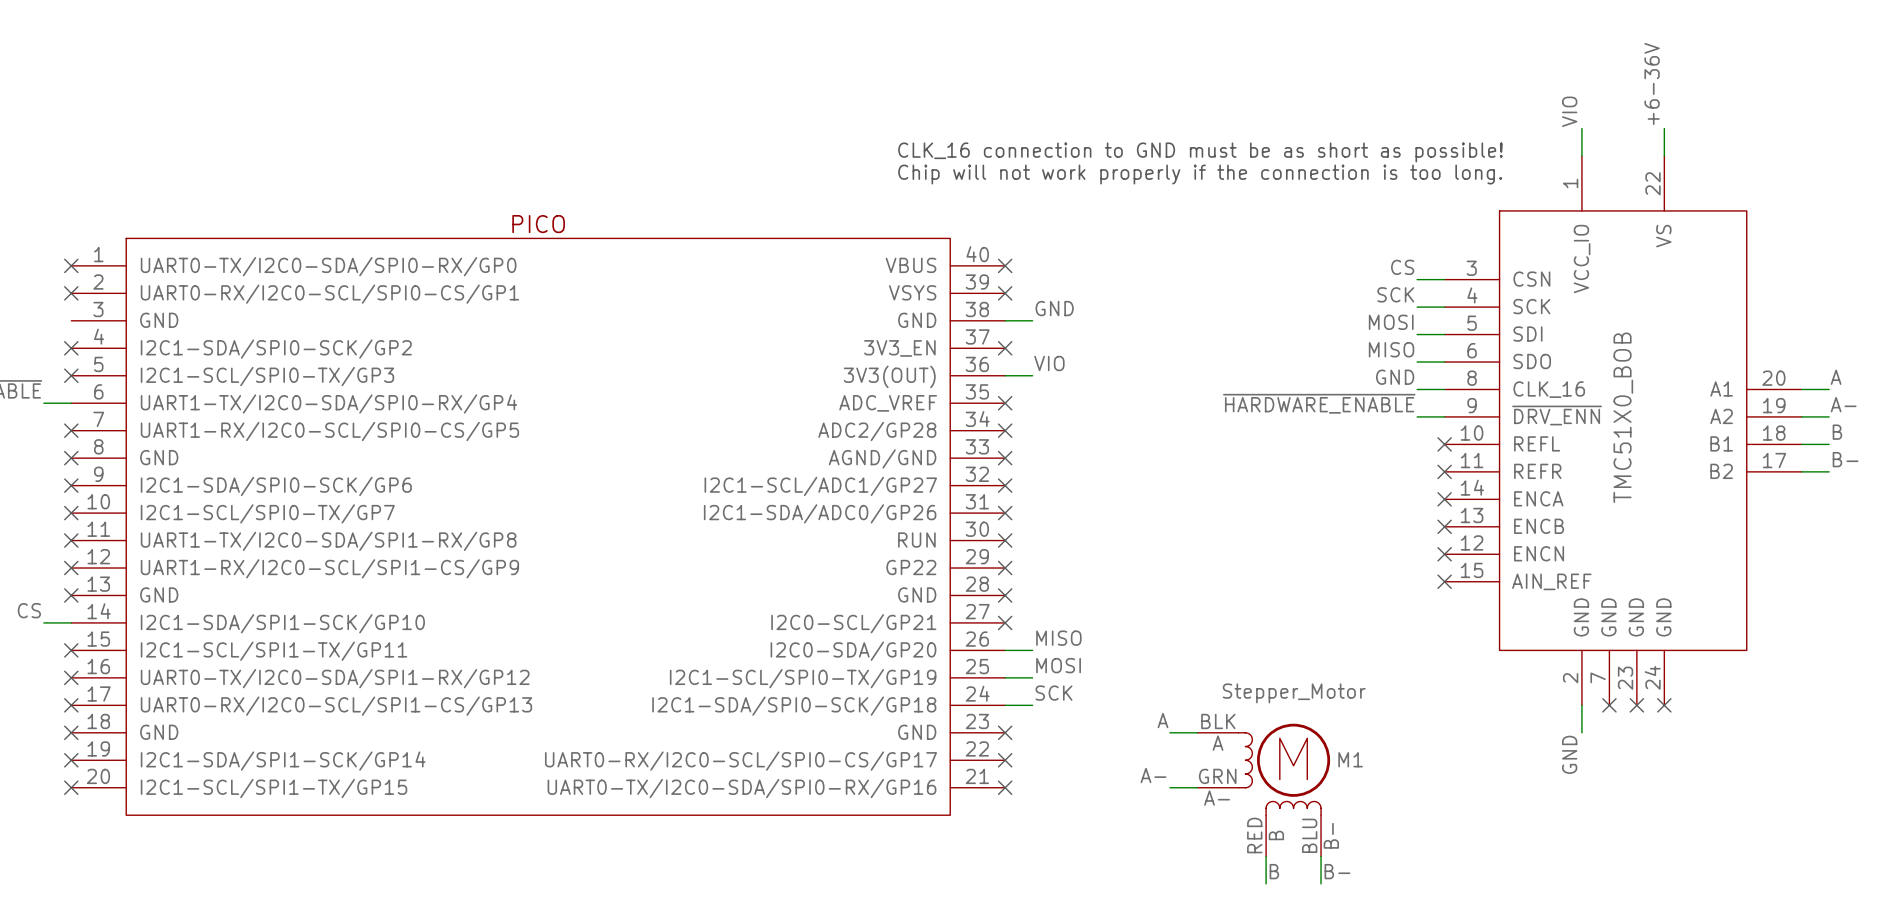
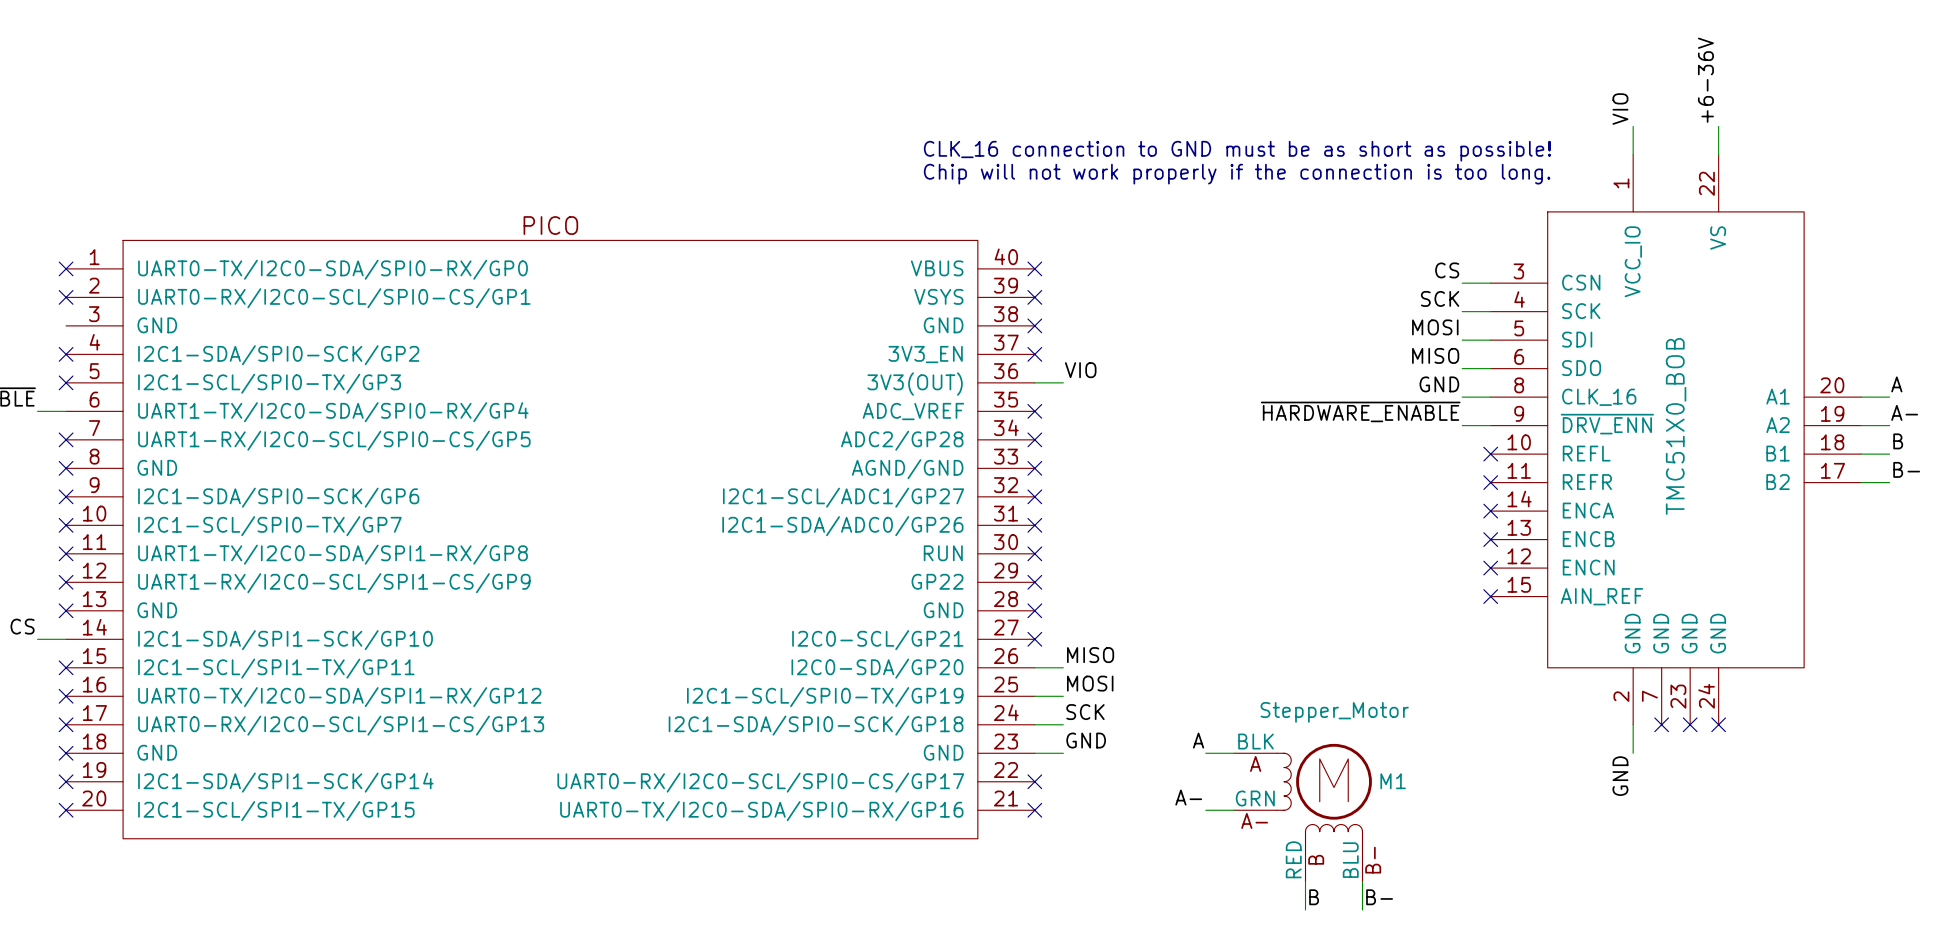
label: GND (1054, 308) -> none
wire: (1005, 320) (1032, 320) -> none
no-connect mark: none -> (1034, 325)
label: none -> GND (1086, 740)
wire: none -> (1034, 753) (1063, 753)
no-connect mark: (1005, 732) -> none

